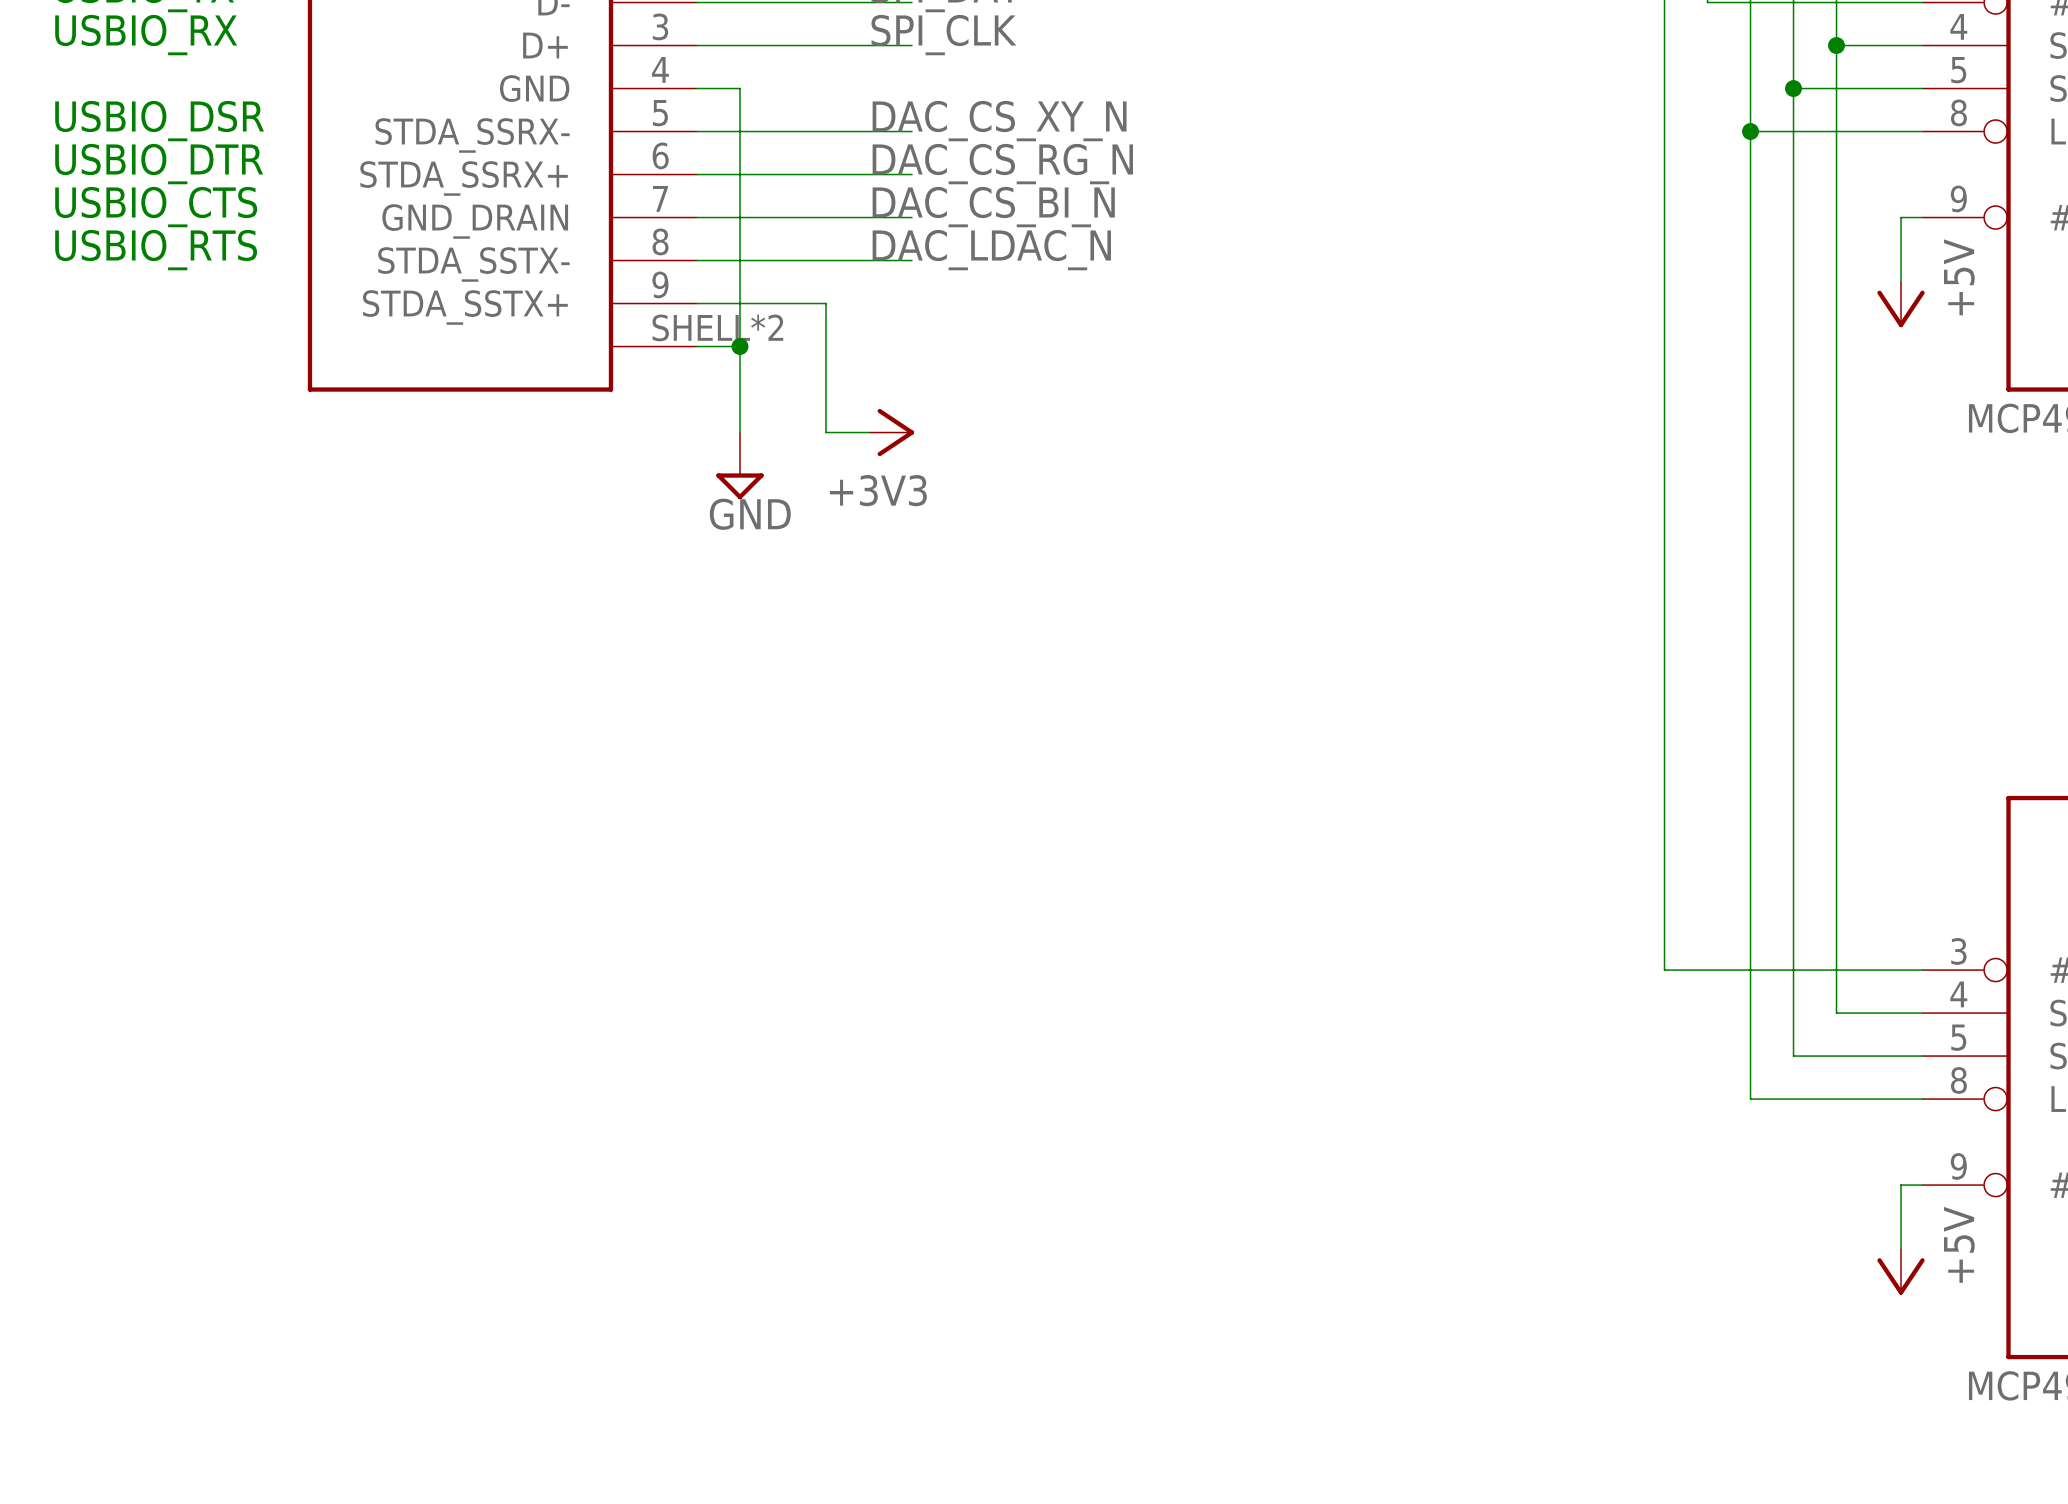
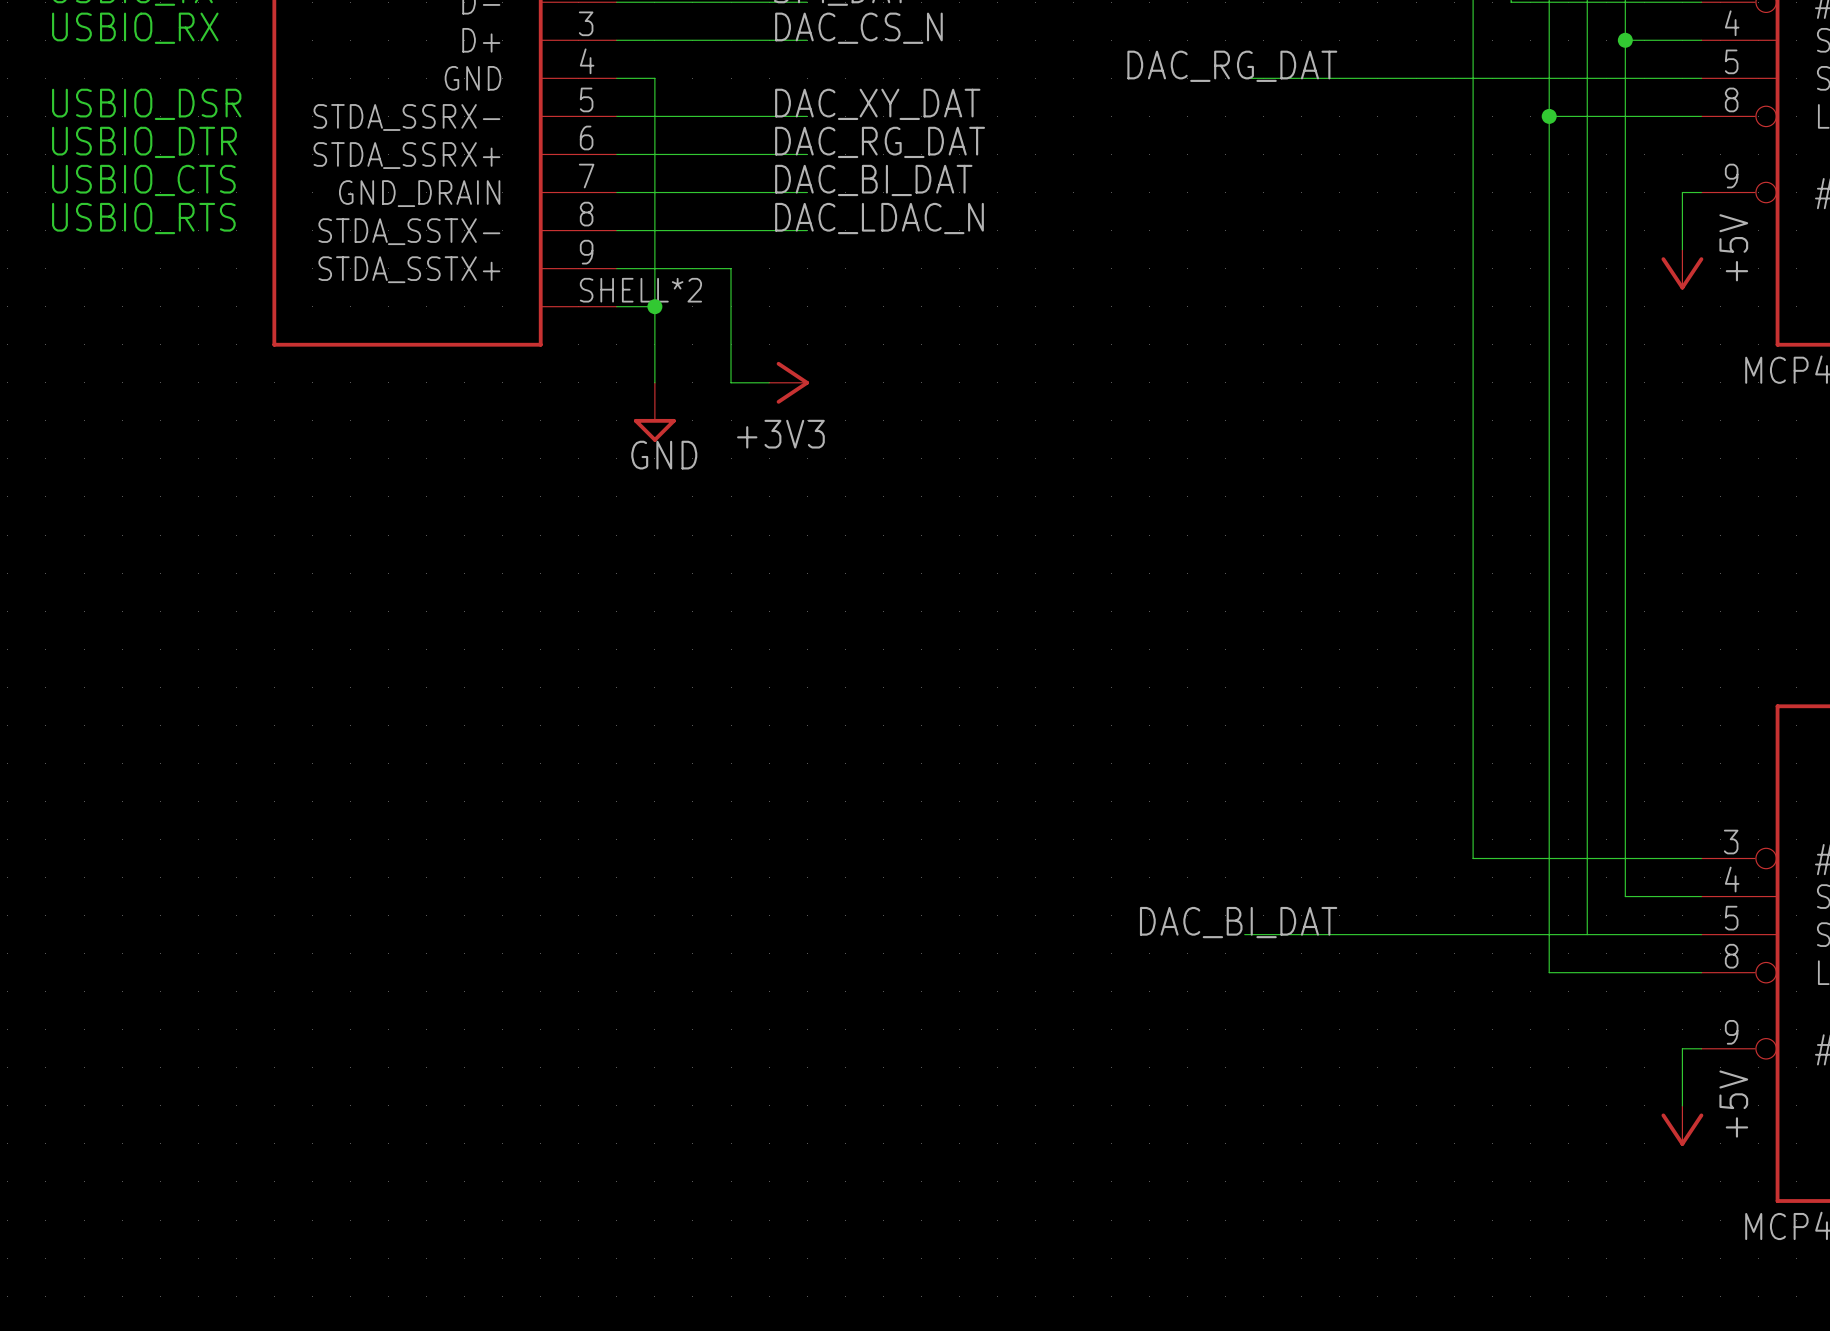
label: SPI_CLK (943, 35) -> DAC_CS_N (858, 28)
label: none -> DAC_RG_DAT (1232, 66)
wire: none -> (1244, 78) (1587, 78)
junction: (1793, 88) -> none
label: DAC_CS_XY_N (999, 121) -> DAC_XY_DAT (877, 104)
label: DAC_CS_RG_N (1002, 164) -> DAC_RG_DAT (880, 142)
label: DAC_CS_BI_N (993, 207) -> DAC_BI_DAT (873, 180)
label: none -> DAC_BI_DAT (1238, 922)
wire: none -> (1244, 934) (1587, 934)

